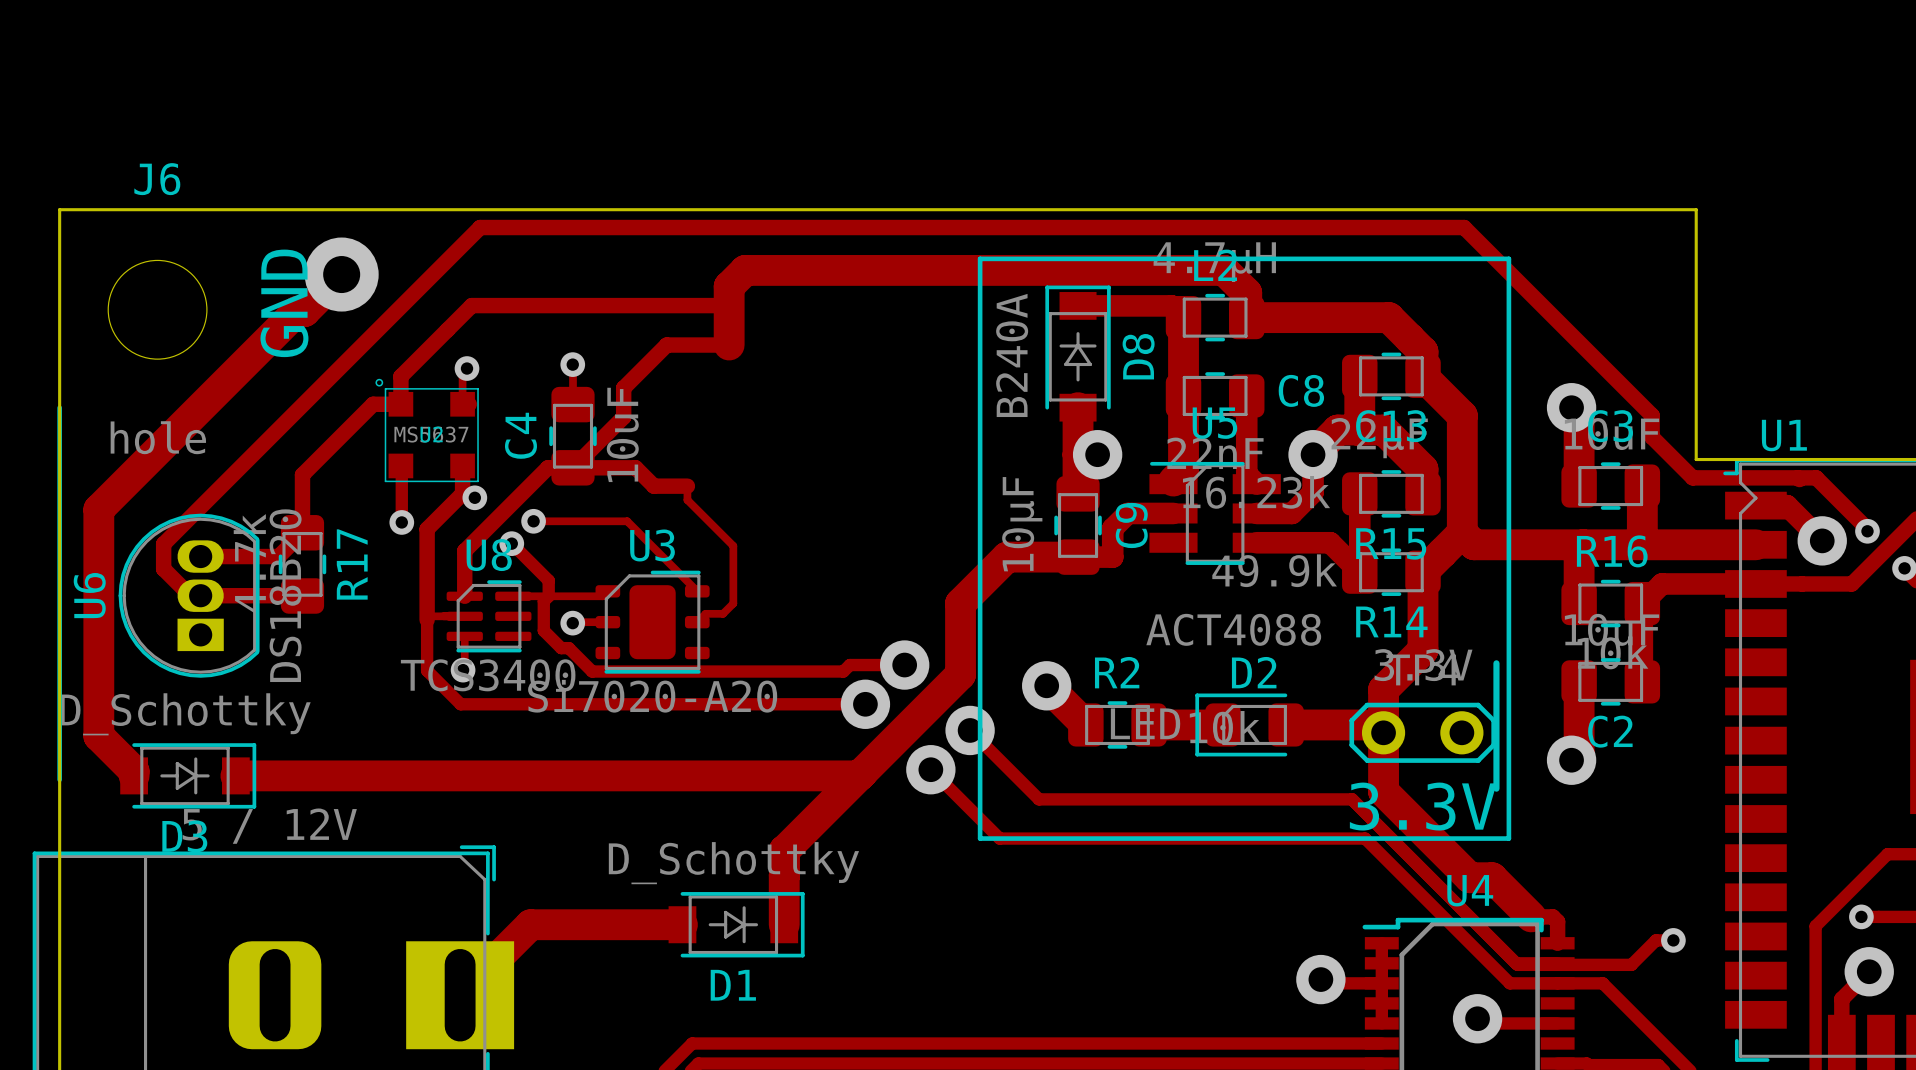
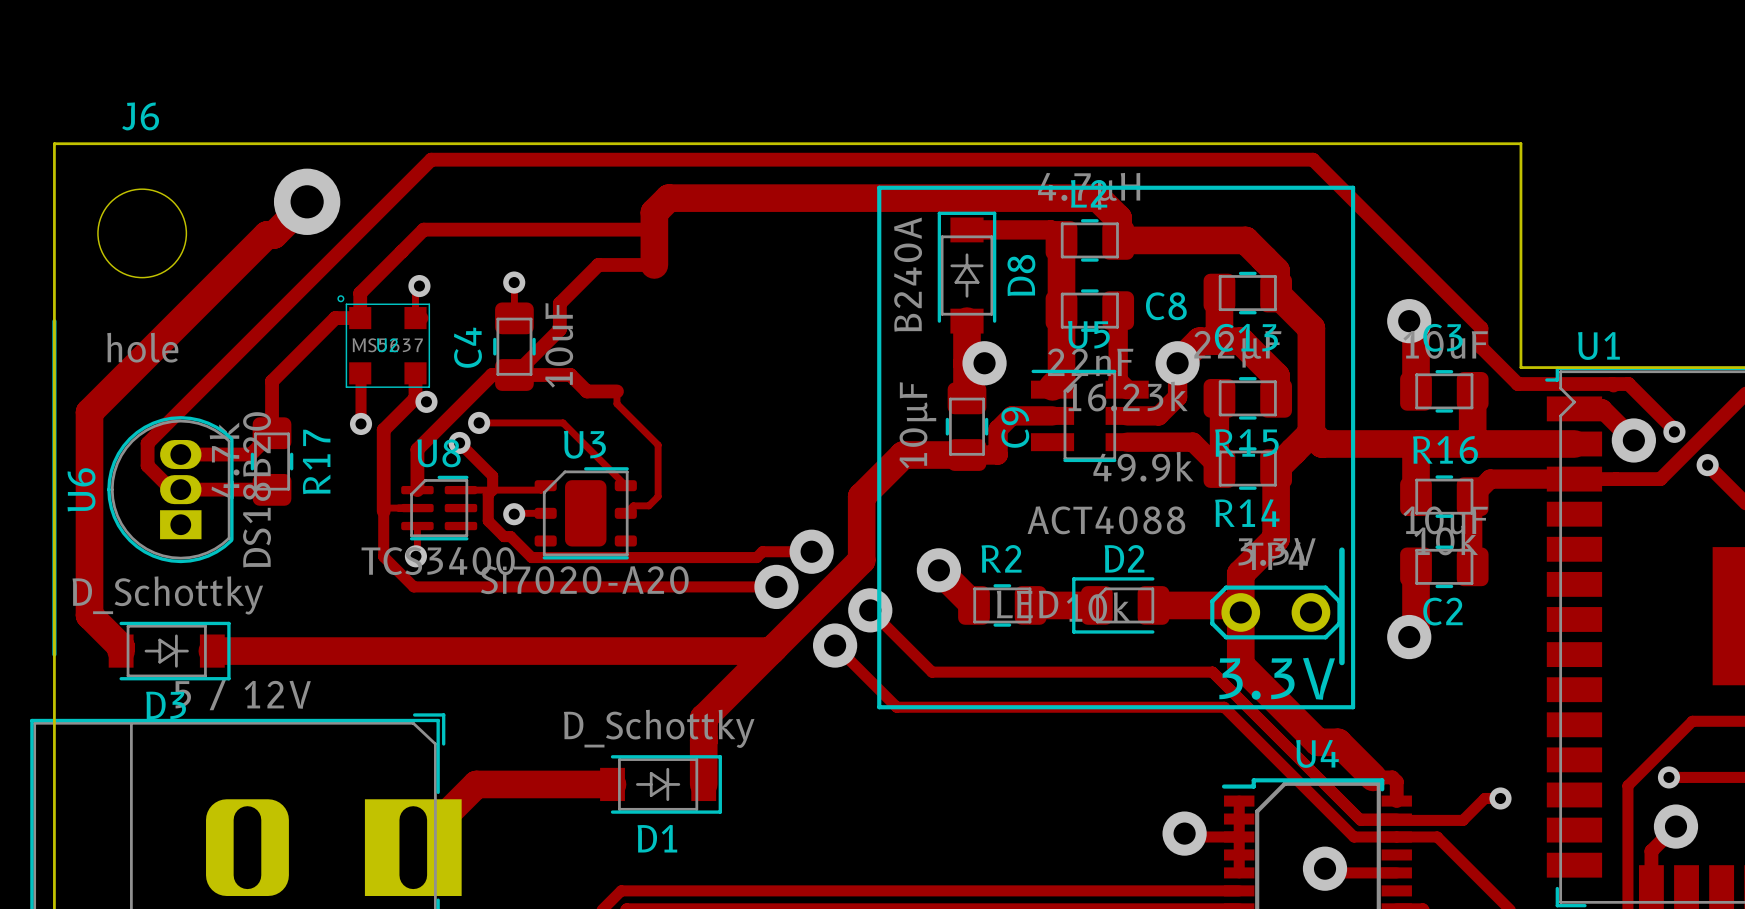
text: GND (284, 303) -> none

